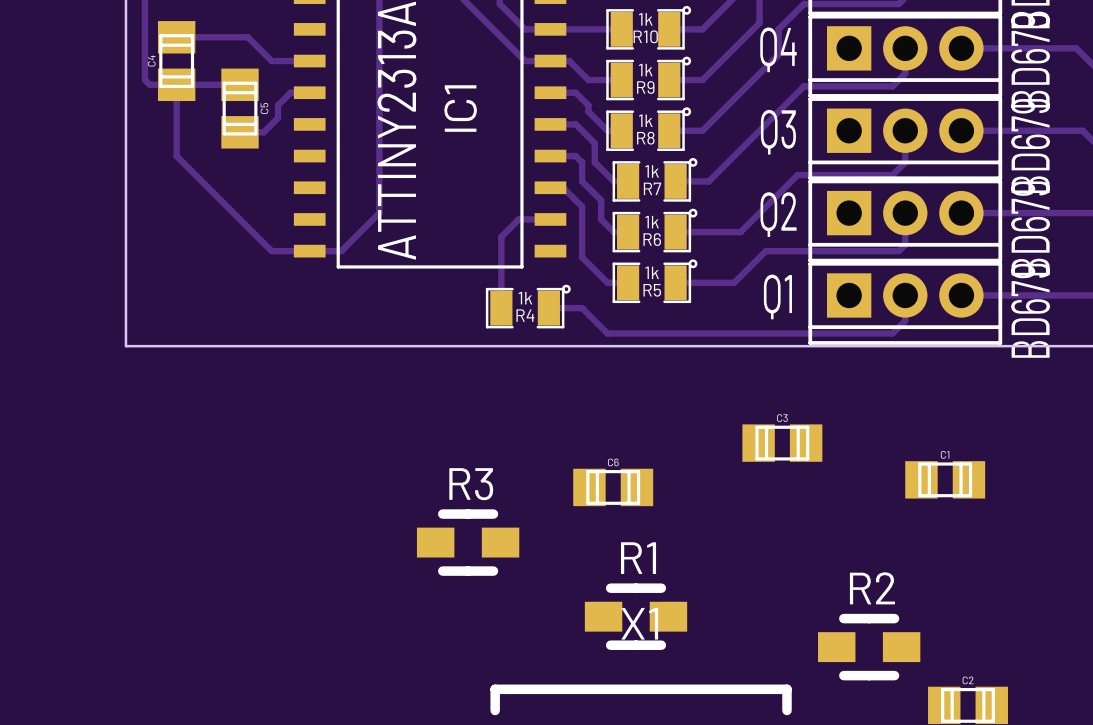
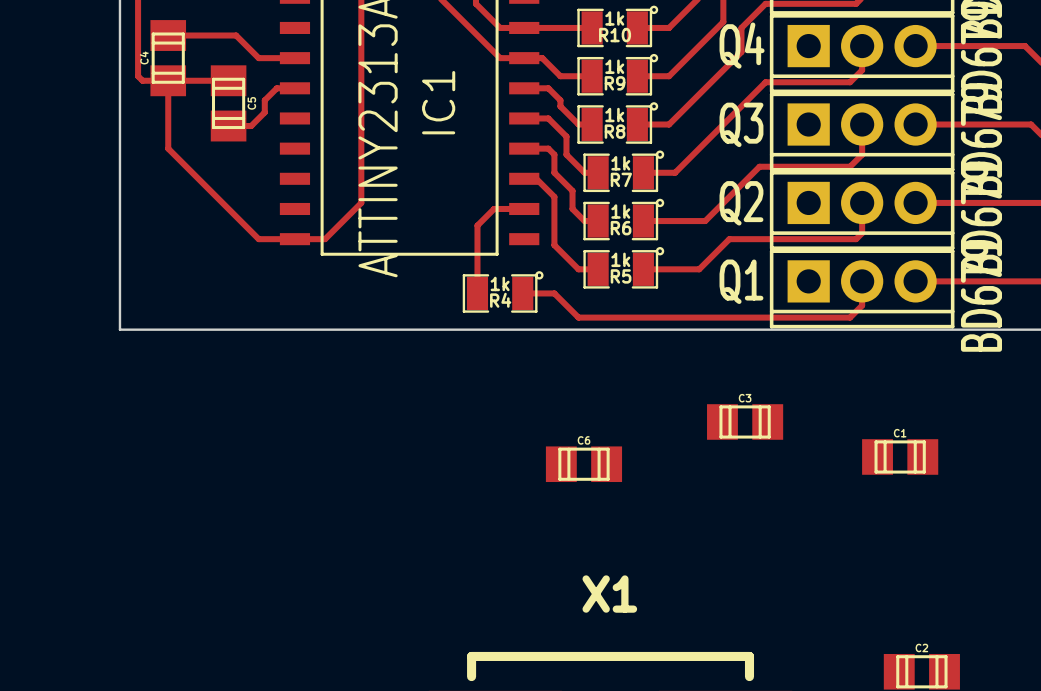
R3: (468, 542) -> none
R1: (636, 616) -> none
R2: (869, 647) -> none

